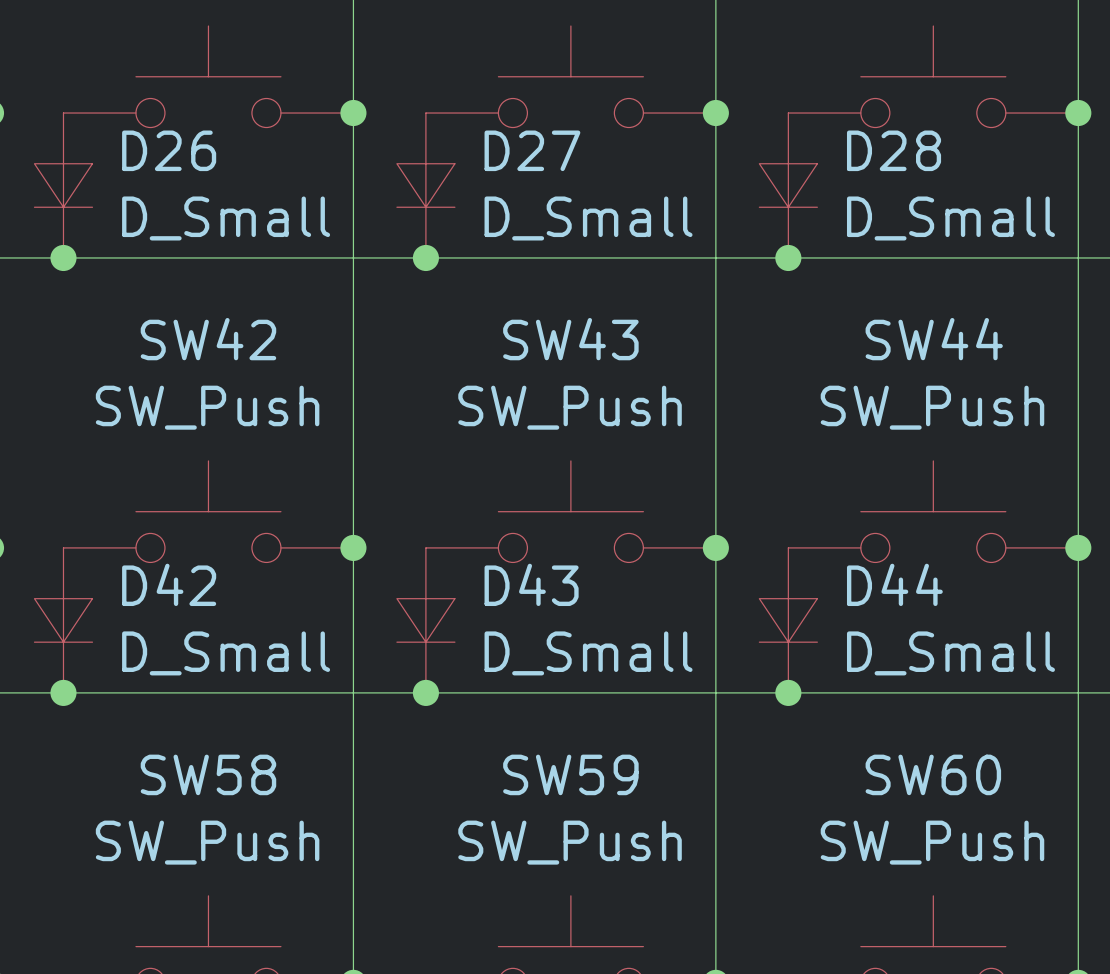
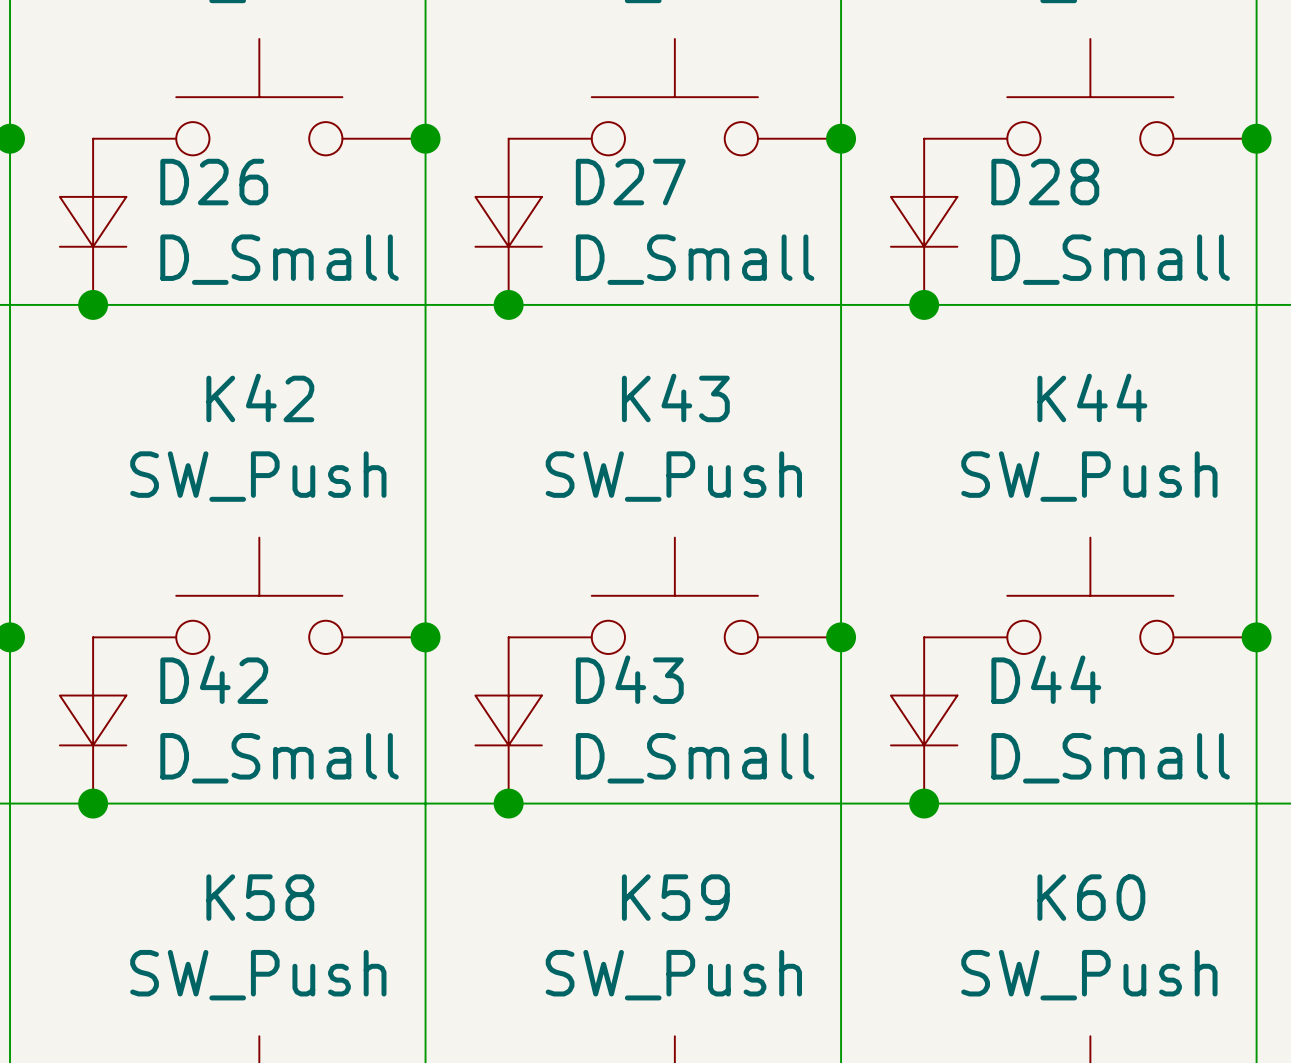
SW42 name: SW42 (208, 339) -> K42 (260, 397)
SW43 name: SW43 (570, 339) -> K43 (675, 397)
SW44 name: SW44 (934, 339) -> K44 (1092, 397)
SW58 name: SW58 (208, 774) -> K58 (260, 897)
SW59 name: SW59 (570, 774) -> K59 (675, 897)
SW60 name: SW60 (933, 774) -> K60 (1091, 897)

